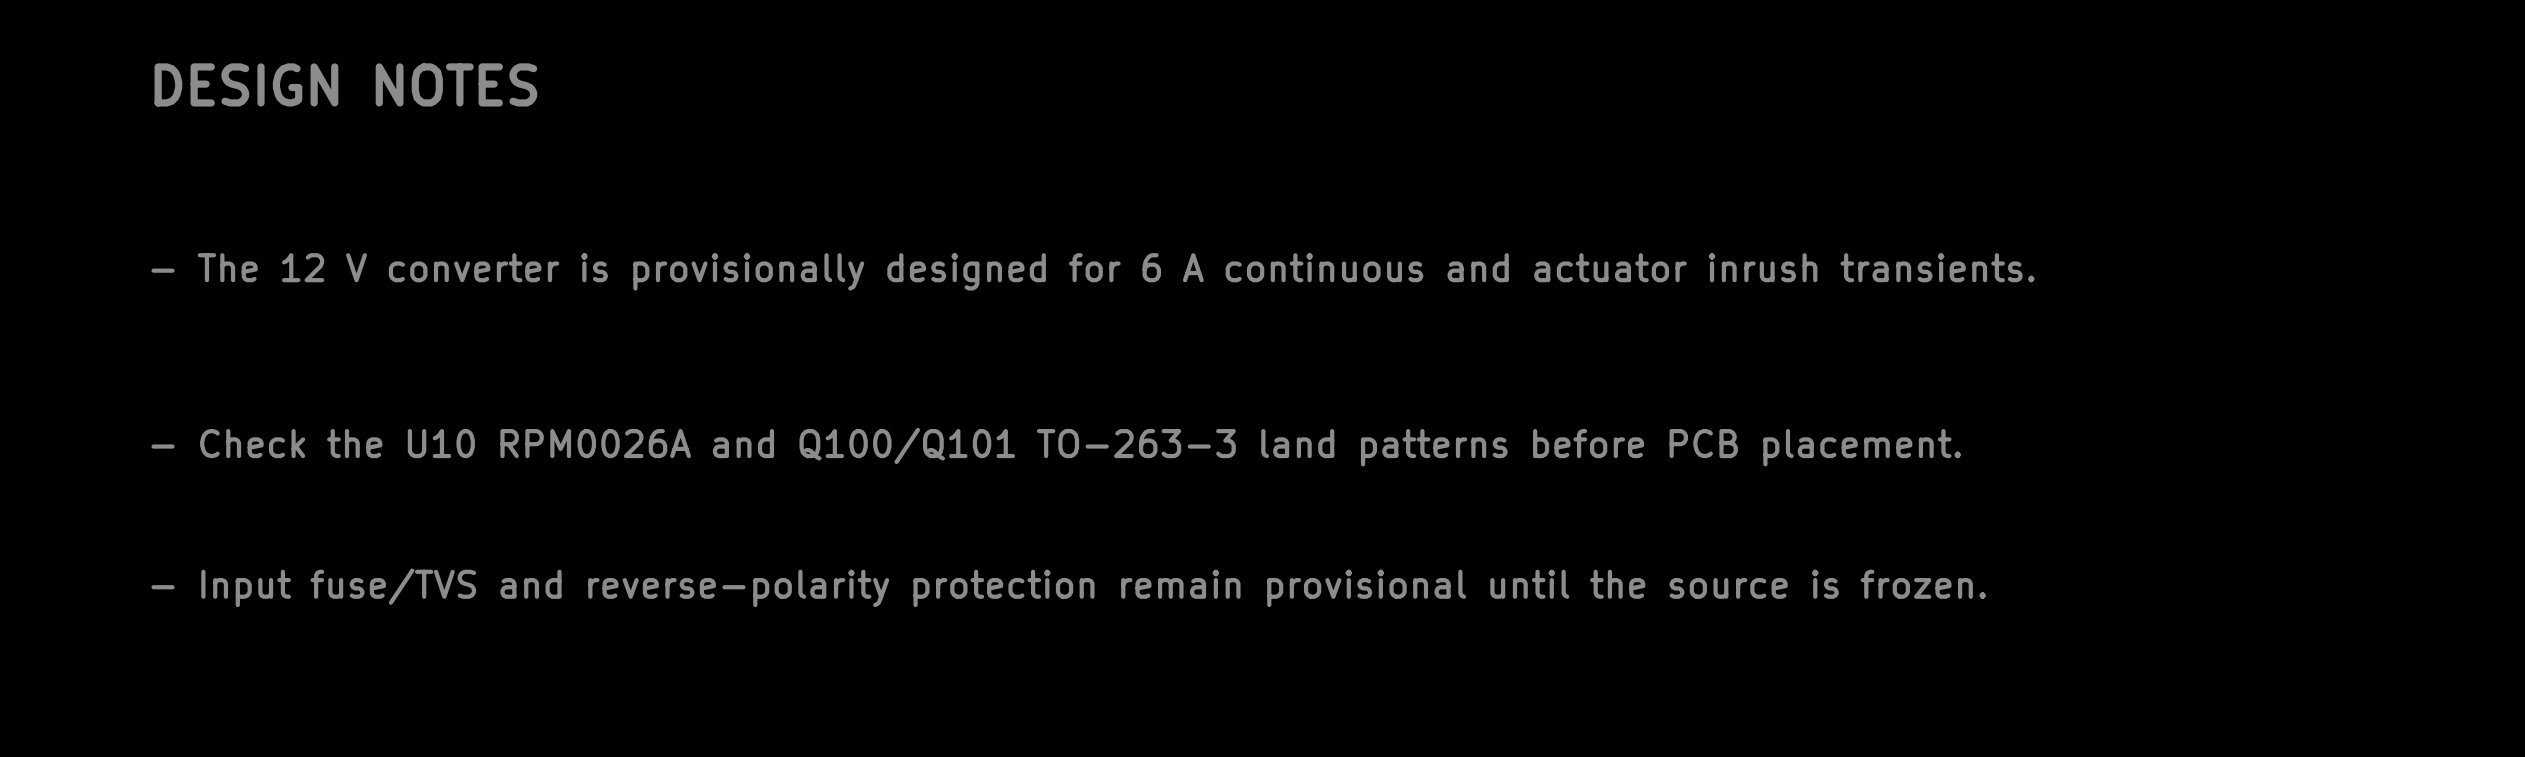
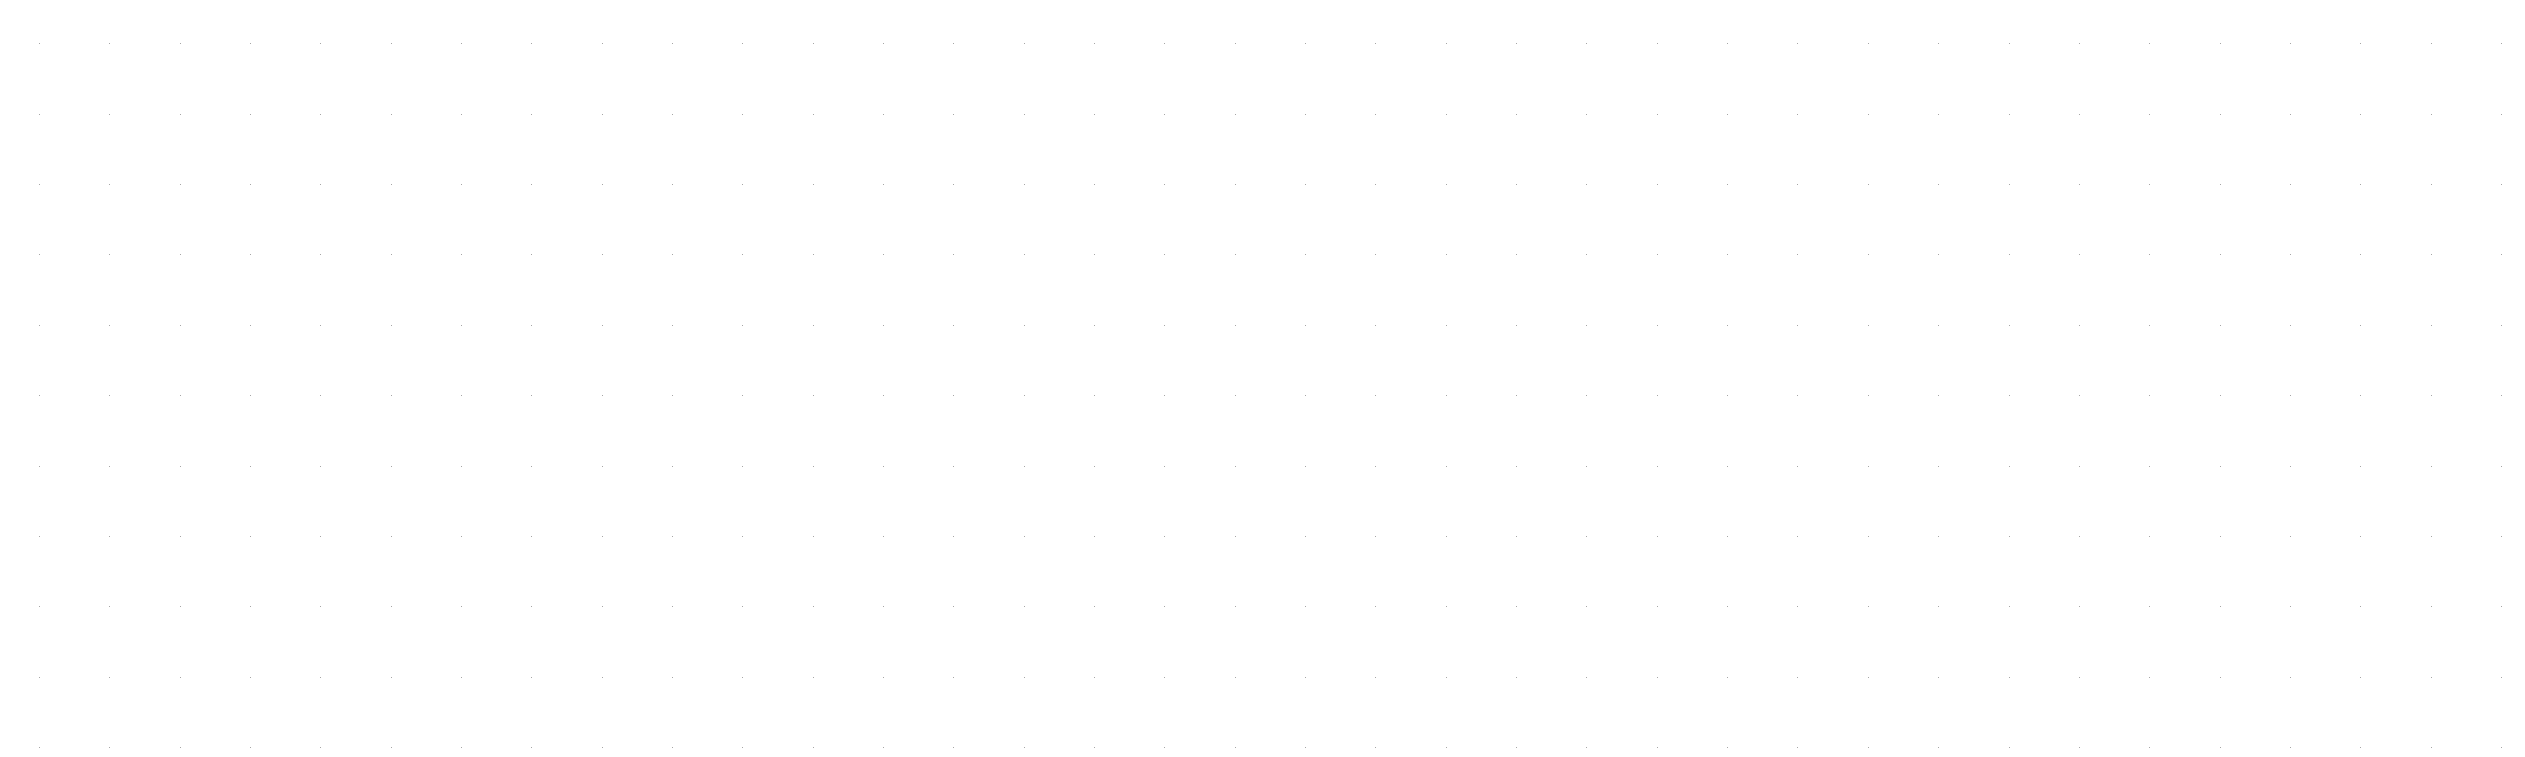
text: DESIGN NOTES (345, 84) -> none
text: - The 12 V converter is provisionally designed for 6 A continuous and actuator inrush transients. (1093, 271) -> none
text: - Check the U10 RPM0026A and Q100/Q101 TO-263-3 land patterns before PCB placement. (1056, 447) -> none
text: - Input fuse/TVS and reverse-polarity protection remain provisional until the source is frozen. (1068, 587) -> none

